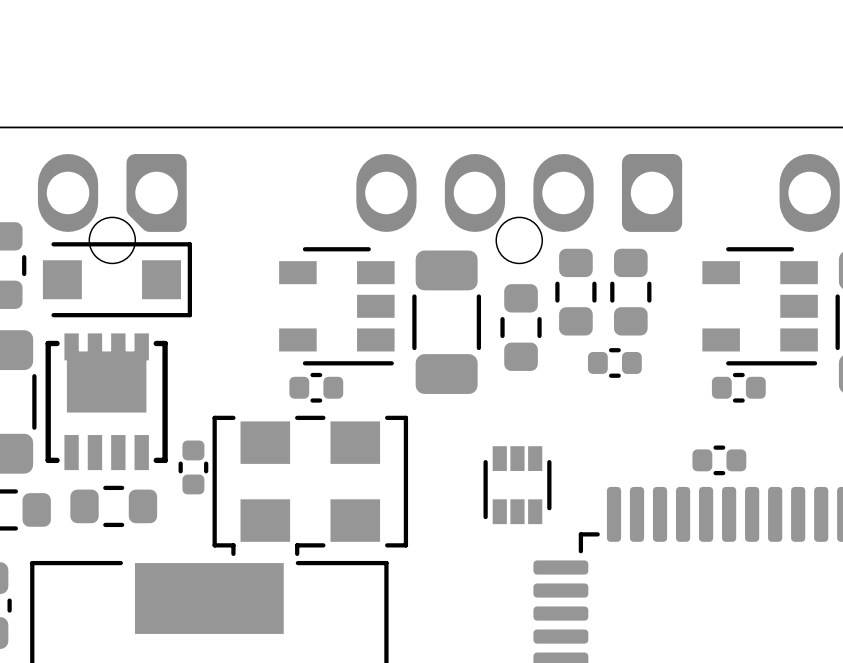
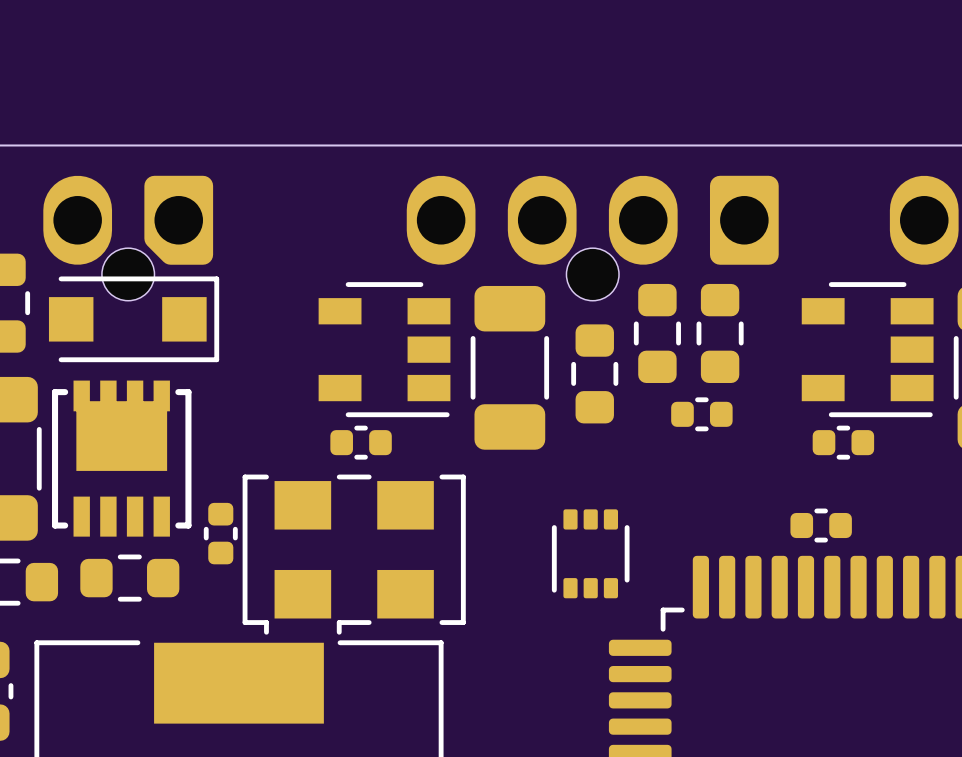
part footprint: [483, 446, 552, 525] -> [551, 509, 630, 599]

